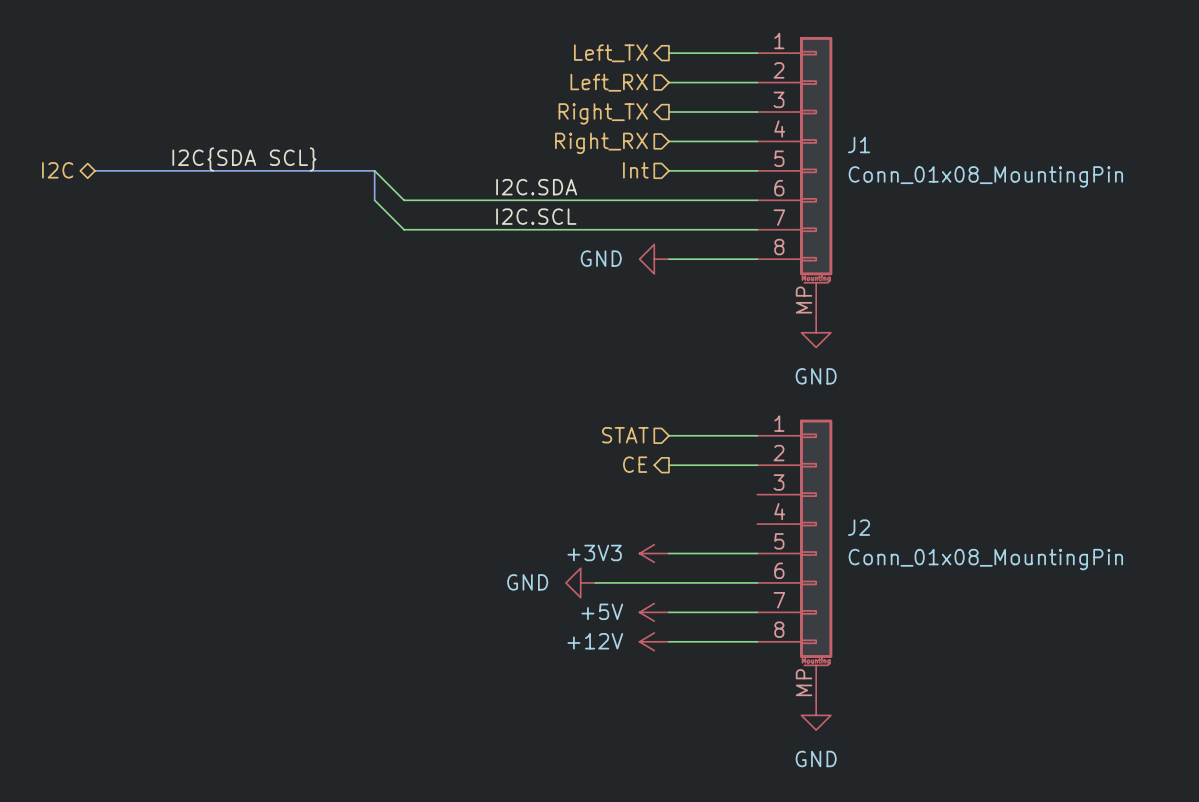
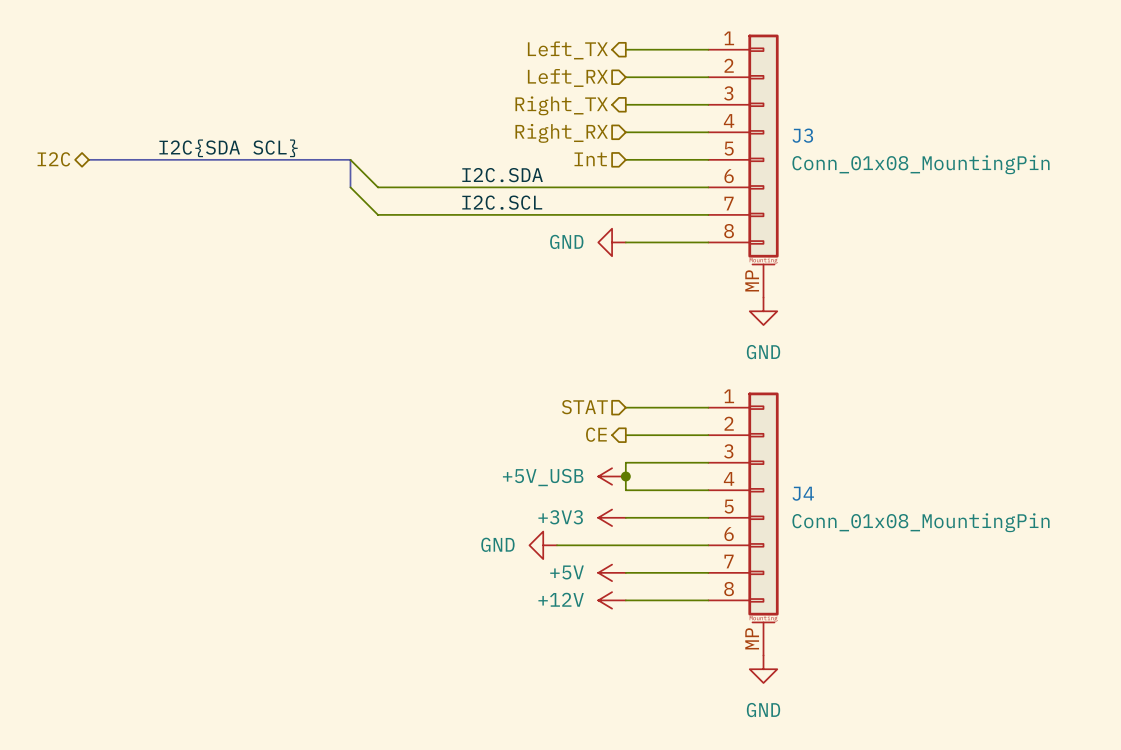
J1 name: J1 (859, 145) -> J3 (802, 135)
wire: none -> (708, 462) (625, 462) (625, 490) (708, 490)
power symbol: none -> +5V_USB (612, 476)
junction: none -> (625, 476)
J2 name: J2 (859, 527) -> J4 (803, 493)

